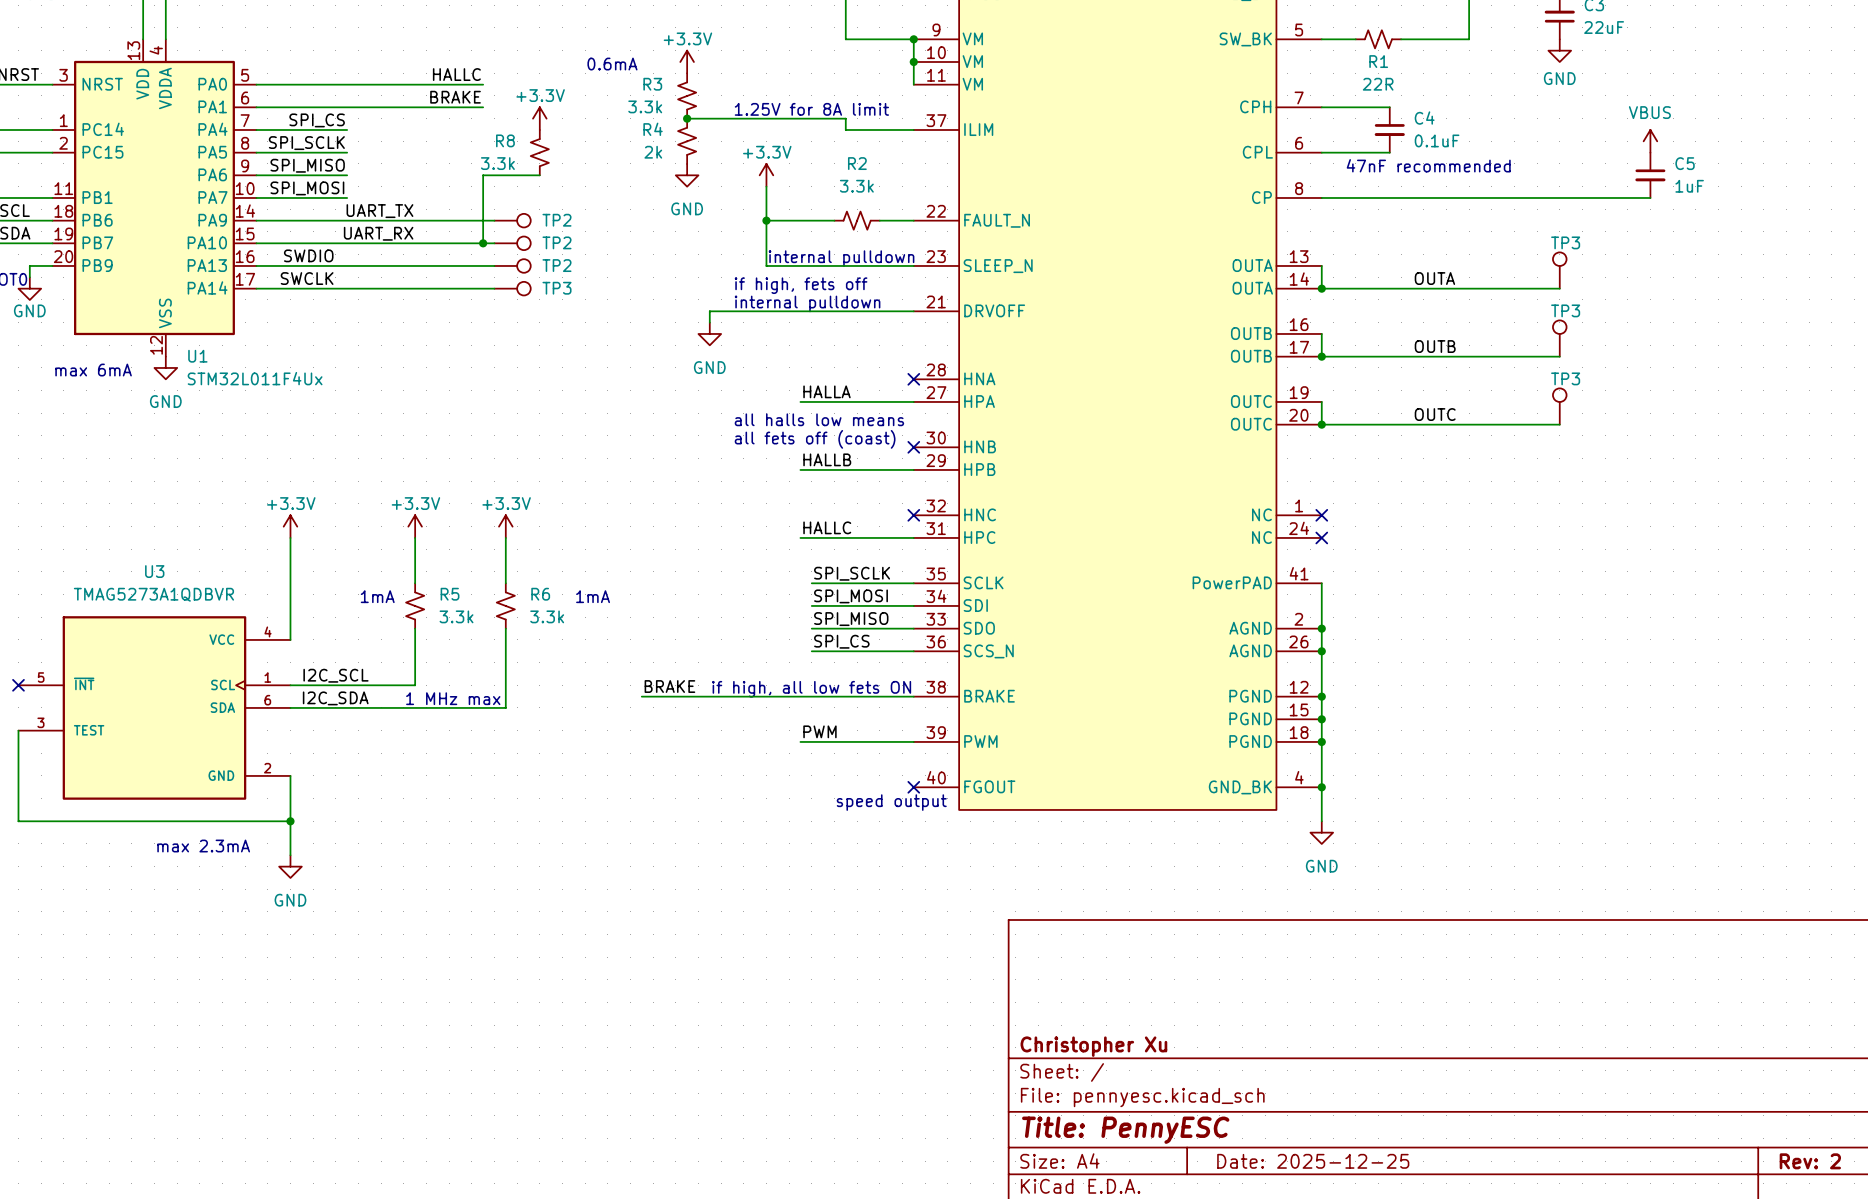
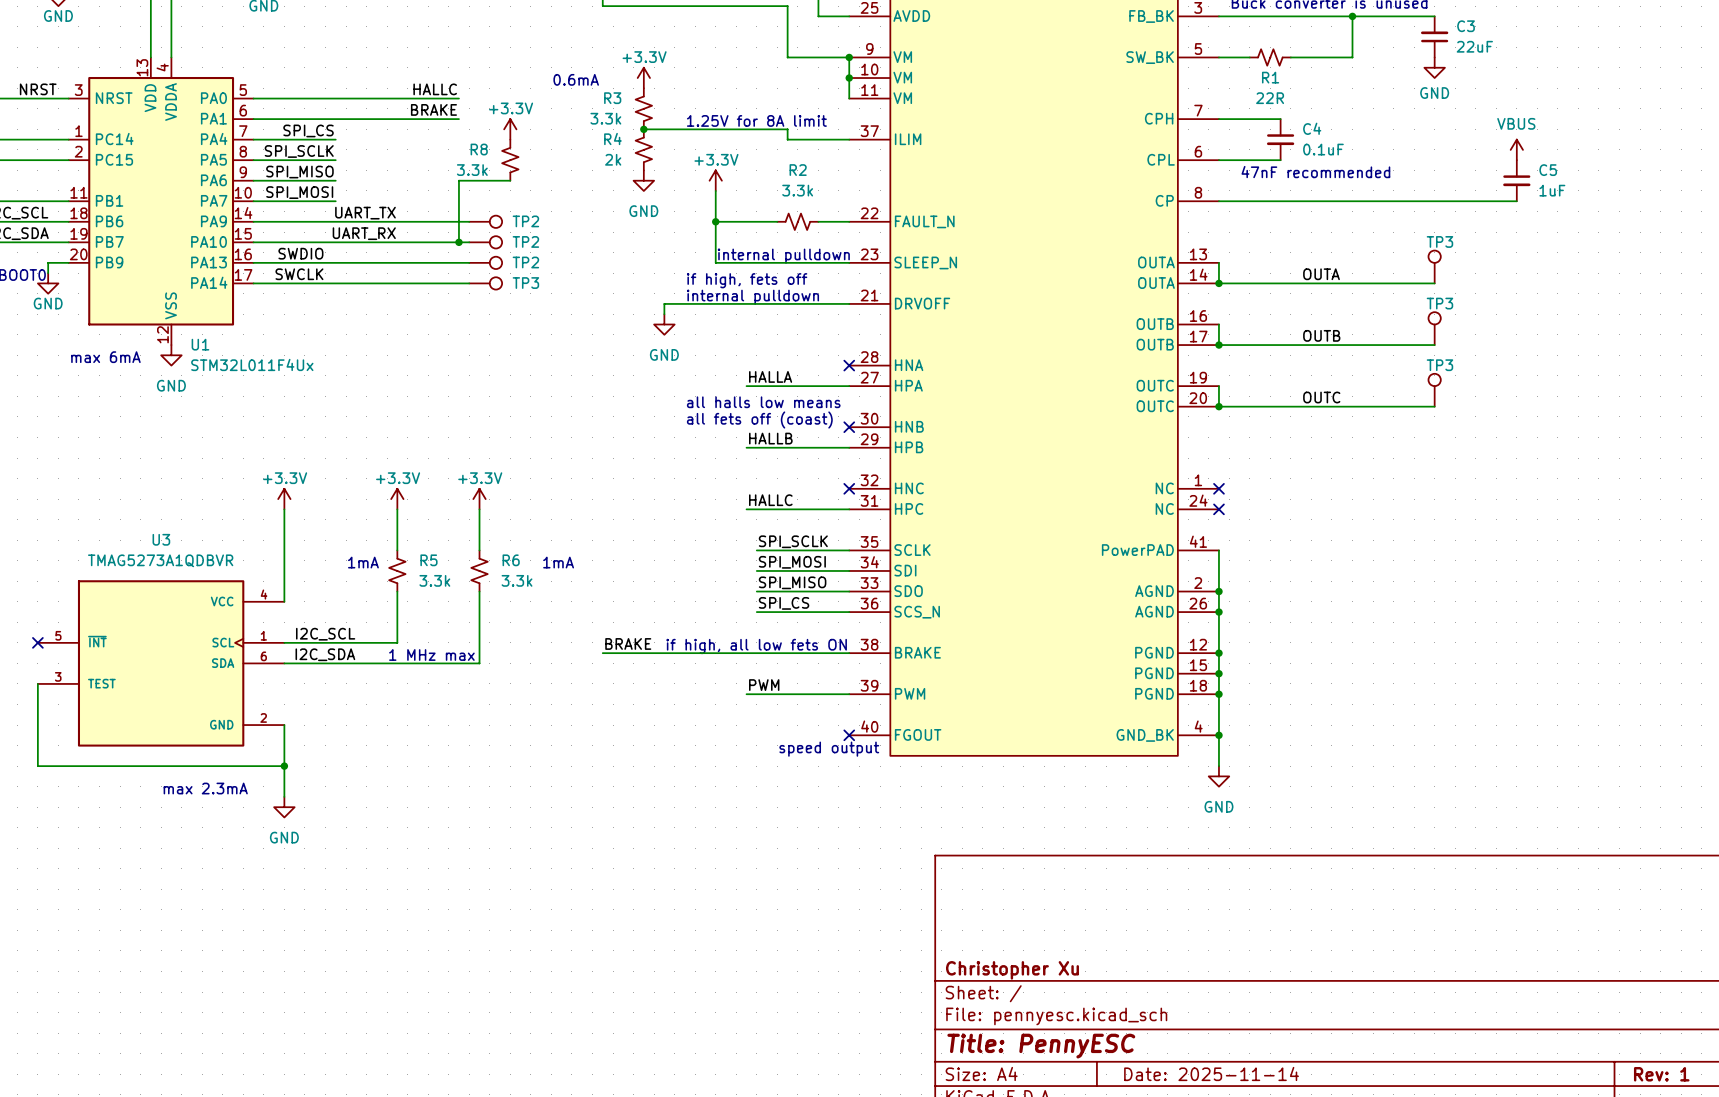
title block: Date: 2025-12-25 (1313, 1161) -> Date: 2025-11-14 (1211, 1073)
title block: Rev: 2 (1810, 1161) -> Rev: 1 (1661, 1074)

